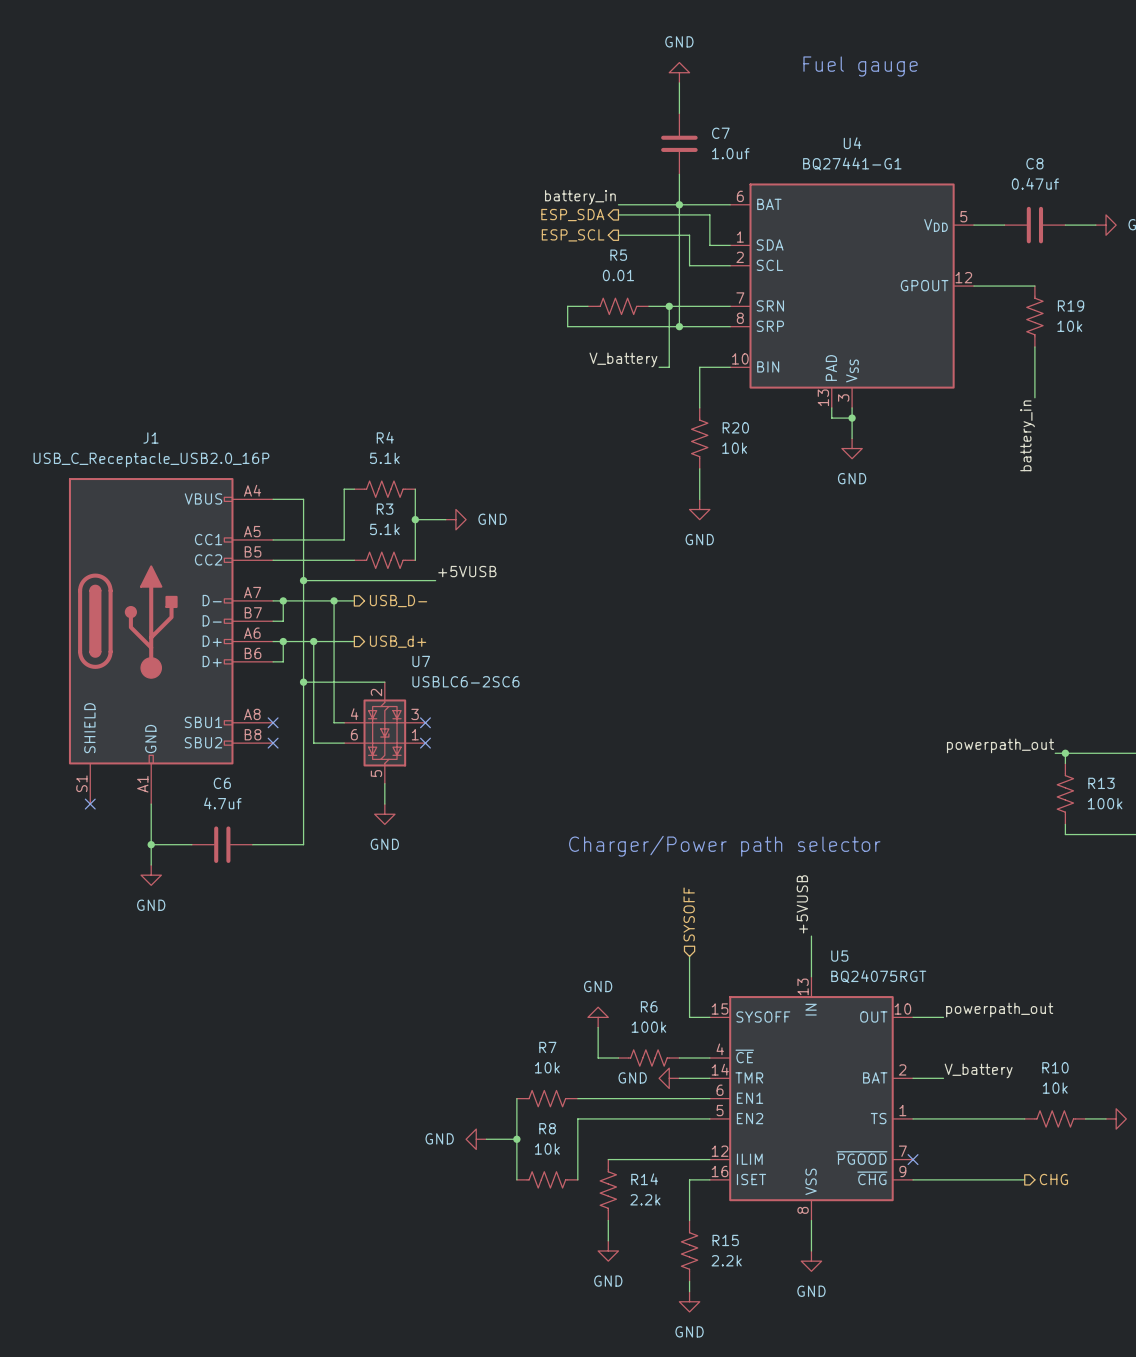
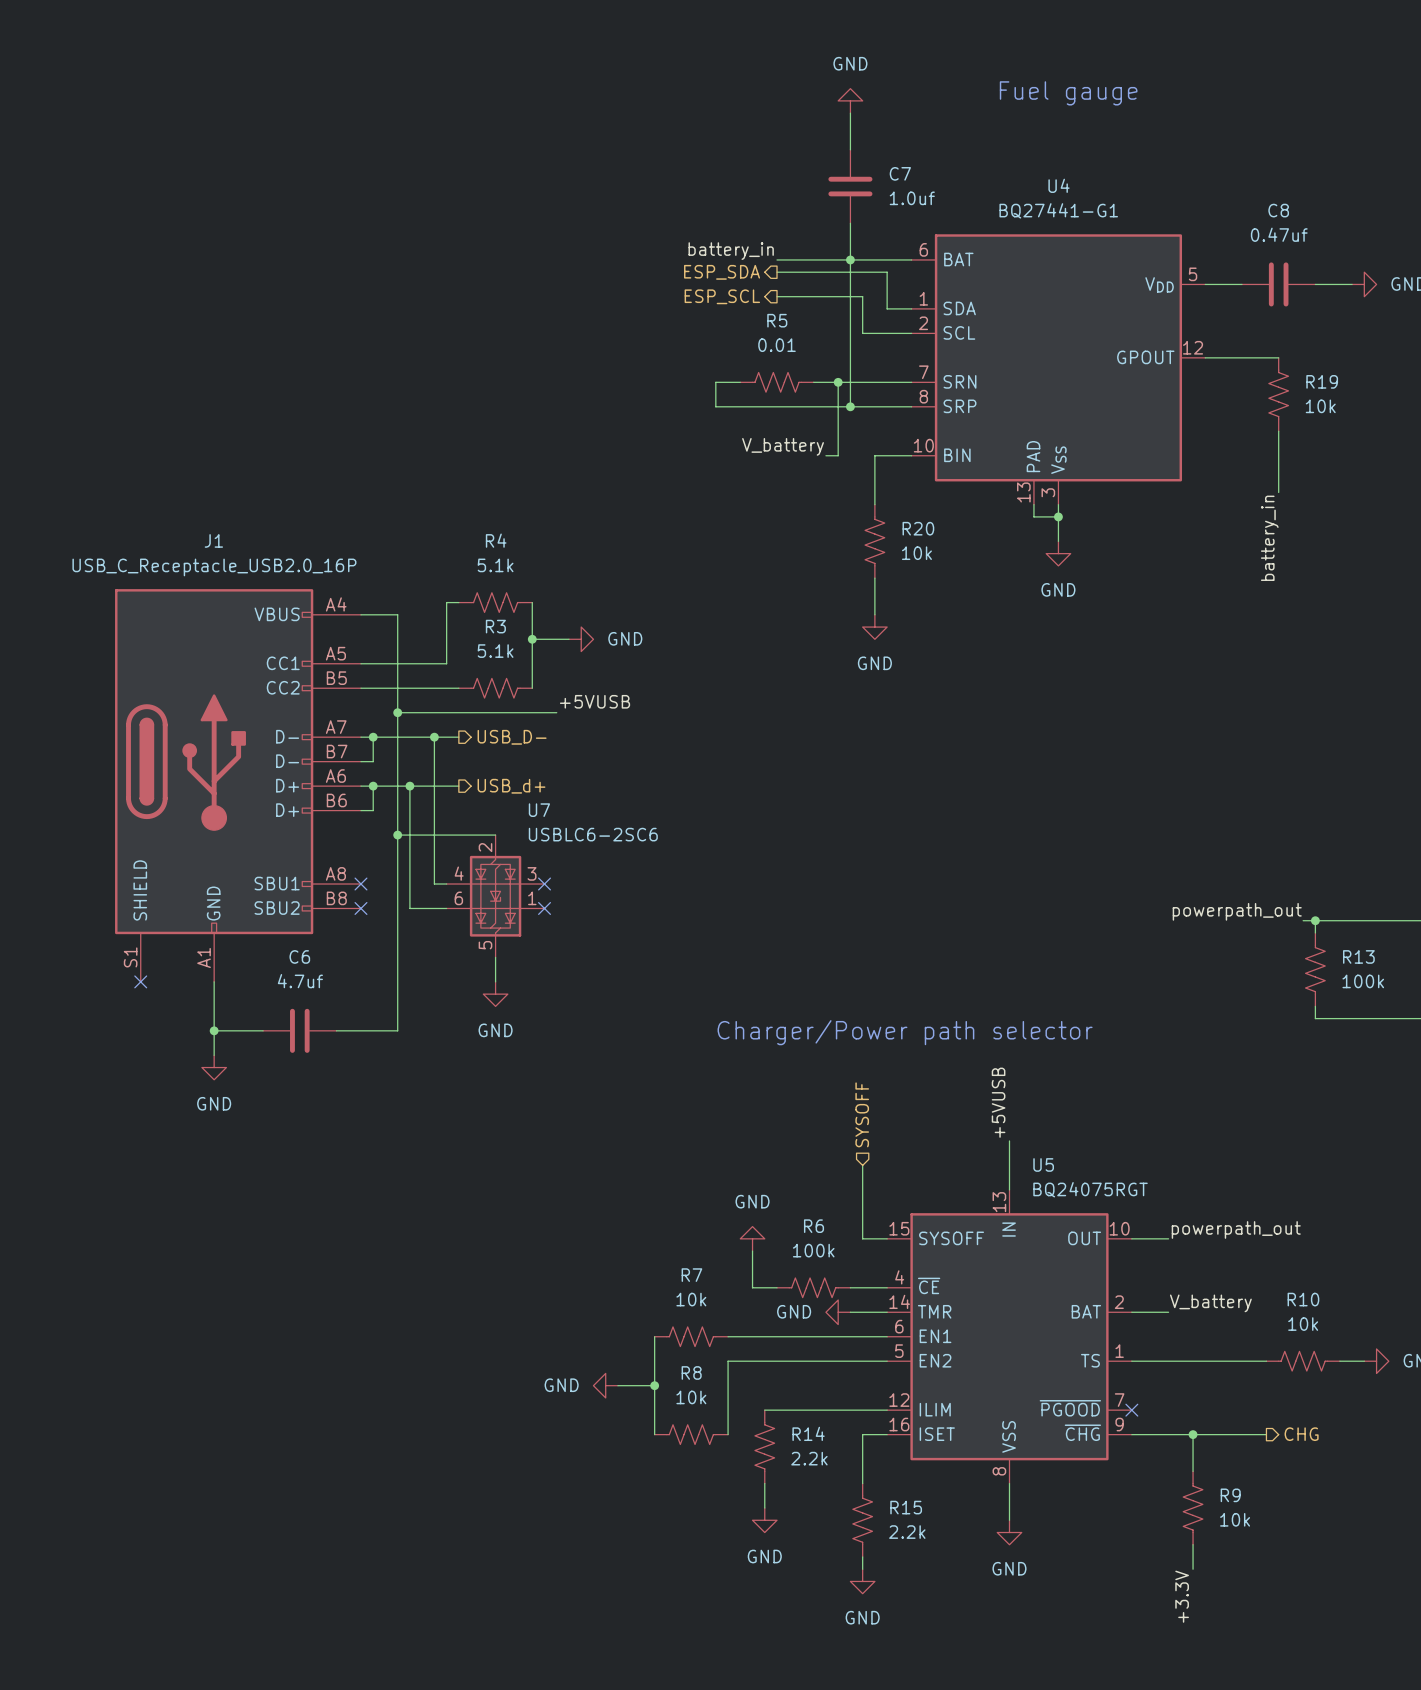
wire: none -> (1193, 1434) (1193, 1471)
junction: none -> (1193, 1434)
R9: none -> 10k (1193, 1508)
wire: none -> (1193, 1544) (1193, 1569)
label: none -> +3.3V (1182, 1596)

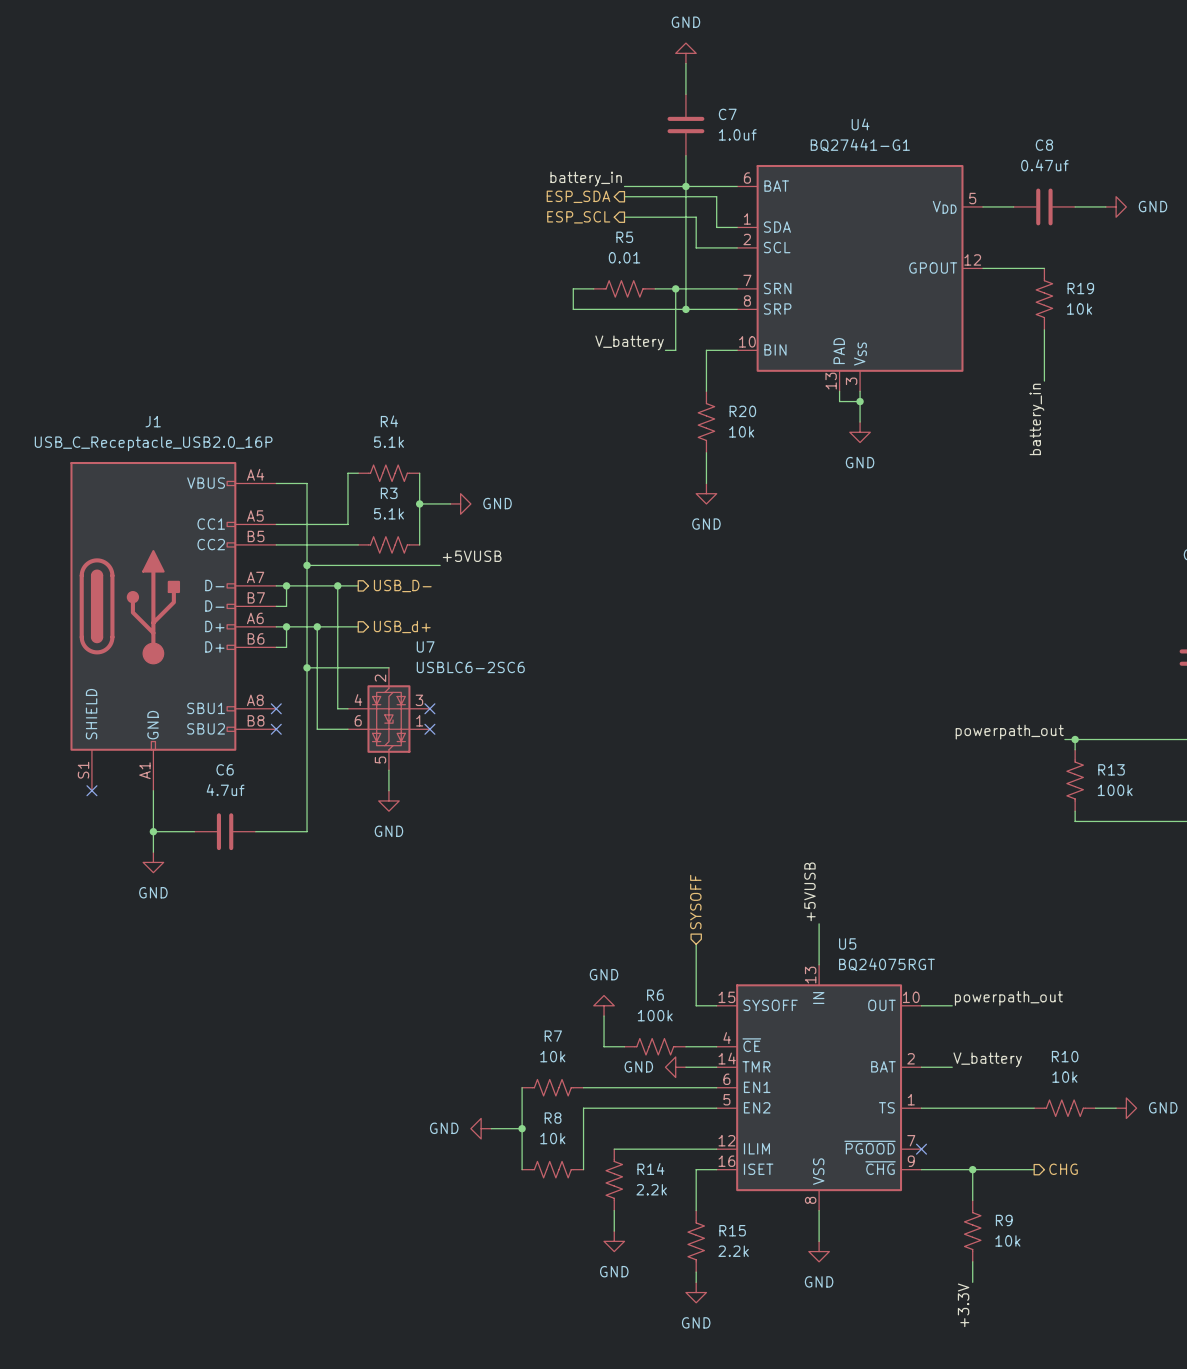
text: Fuel gauge (1068, 93) -> none
text: Charger/Power path selector (905, 1032) -> none

